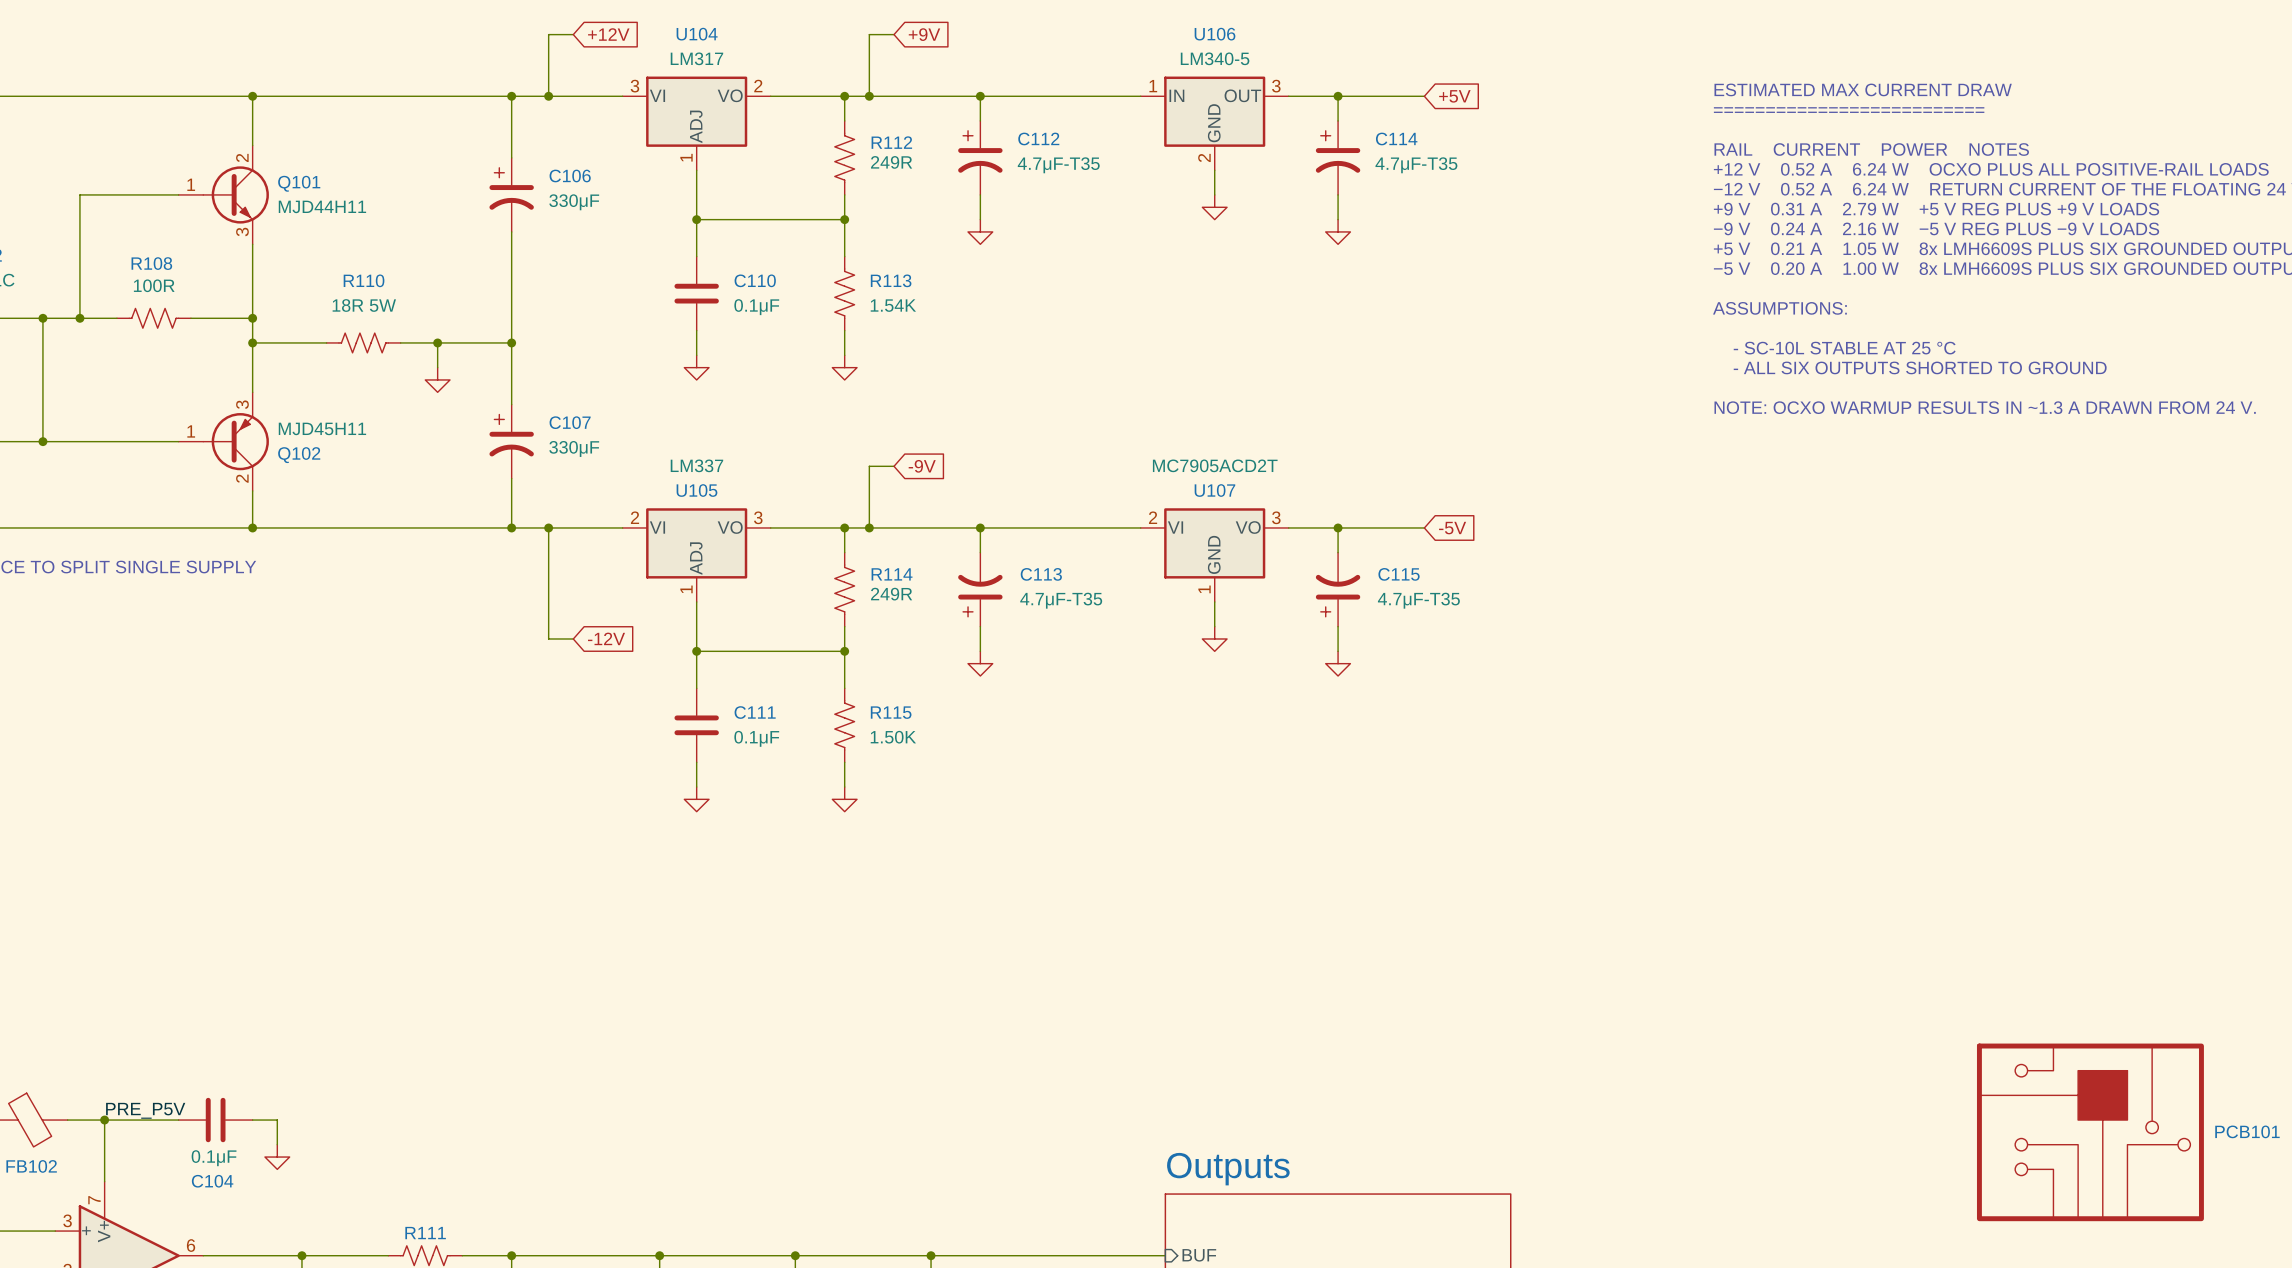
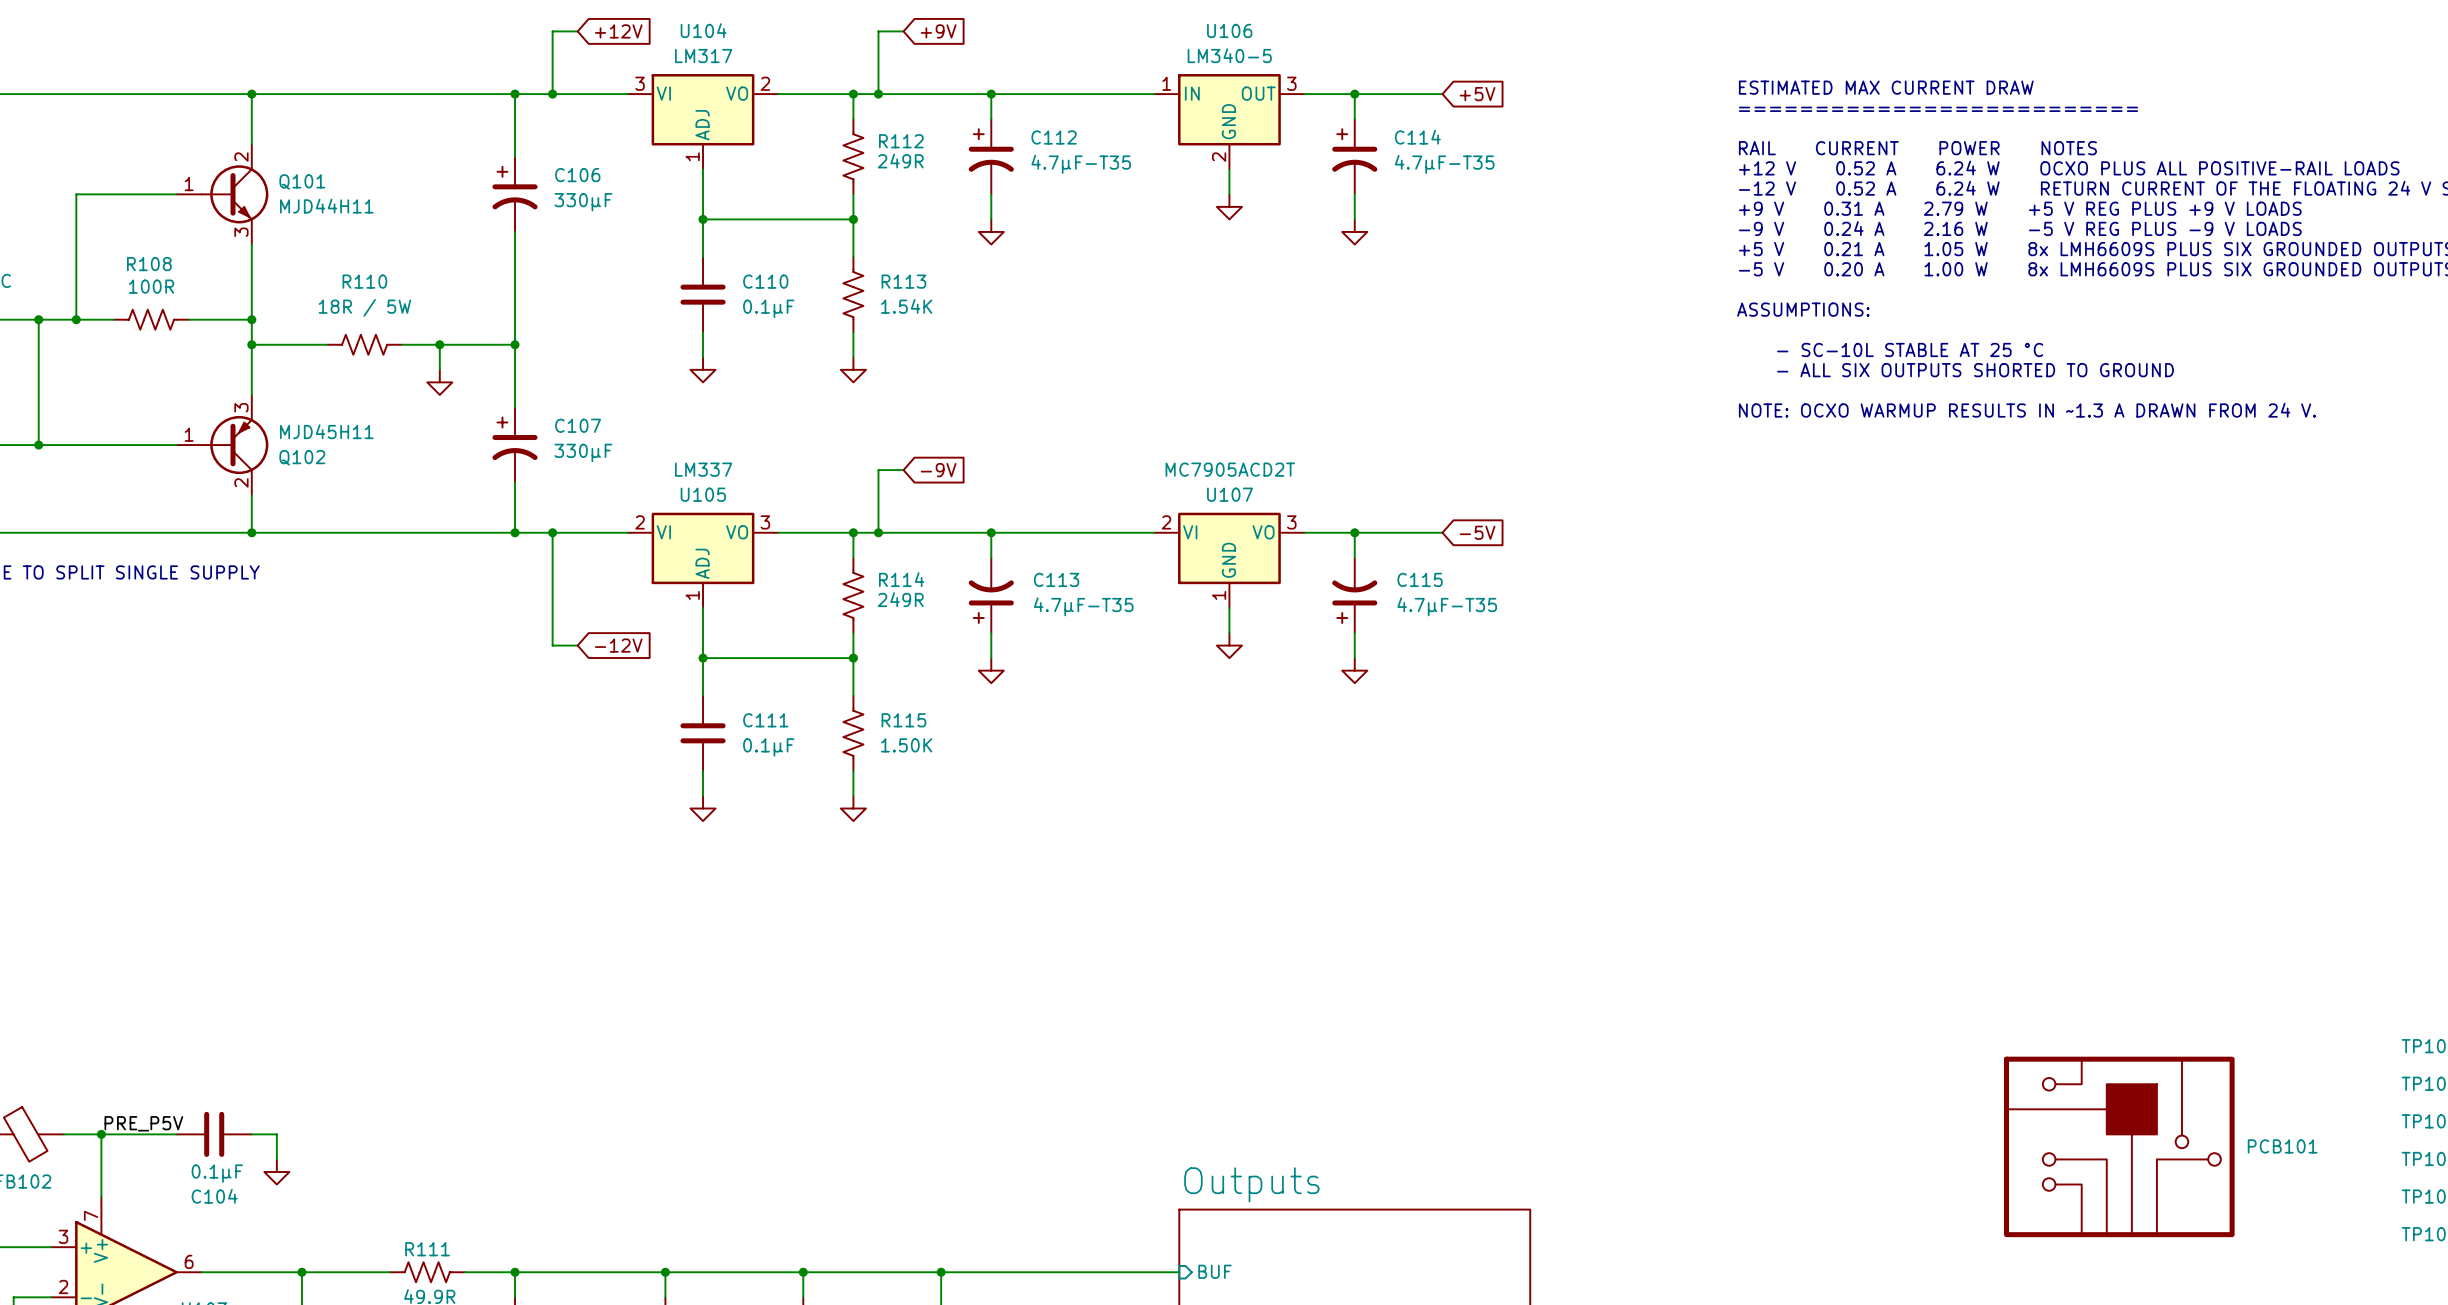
R110 value: 18R 5W (364, 305) -> 18R / 5W (364, 307)

